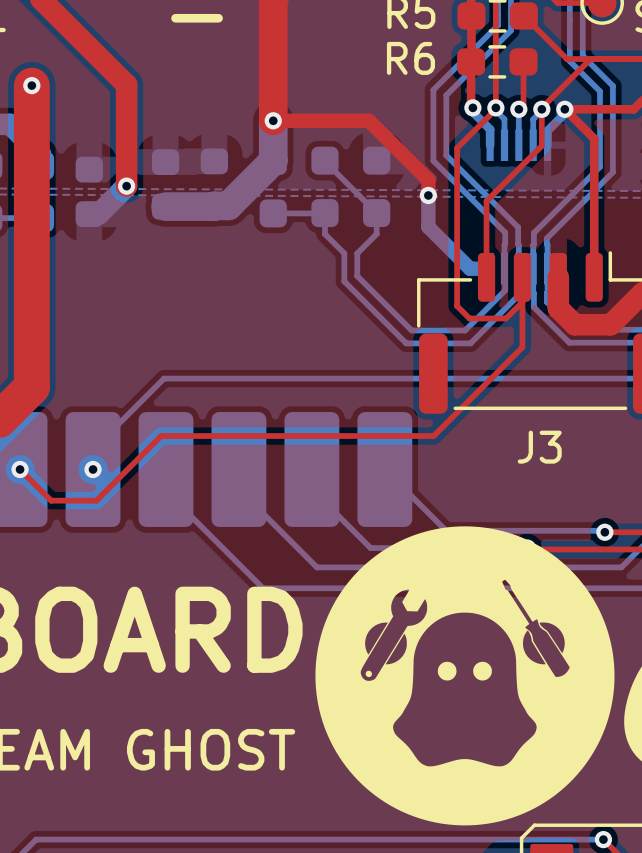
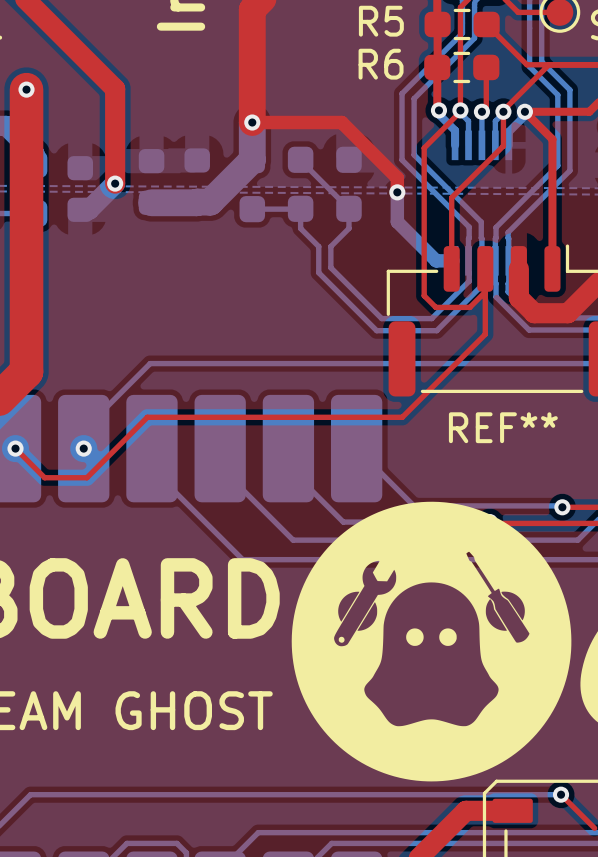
J3 name: J3 (539, 447) -> REF** (503, 427)

